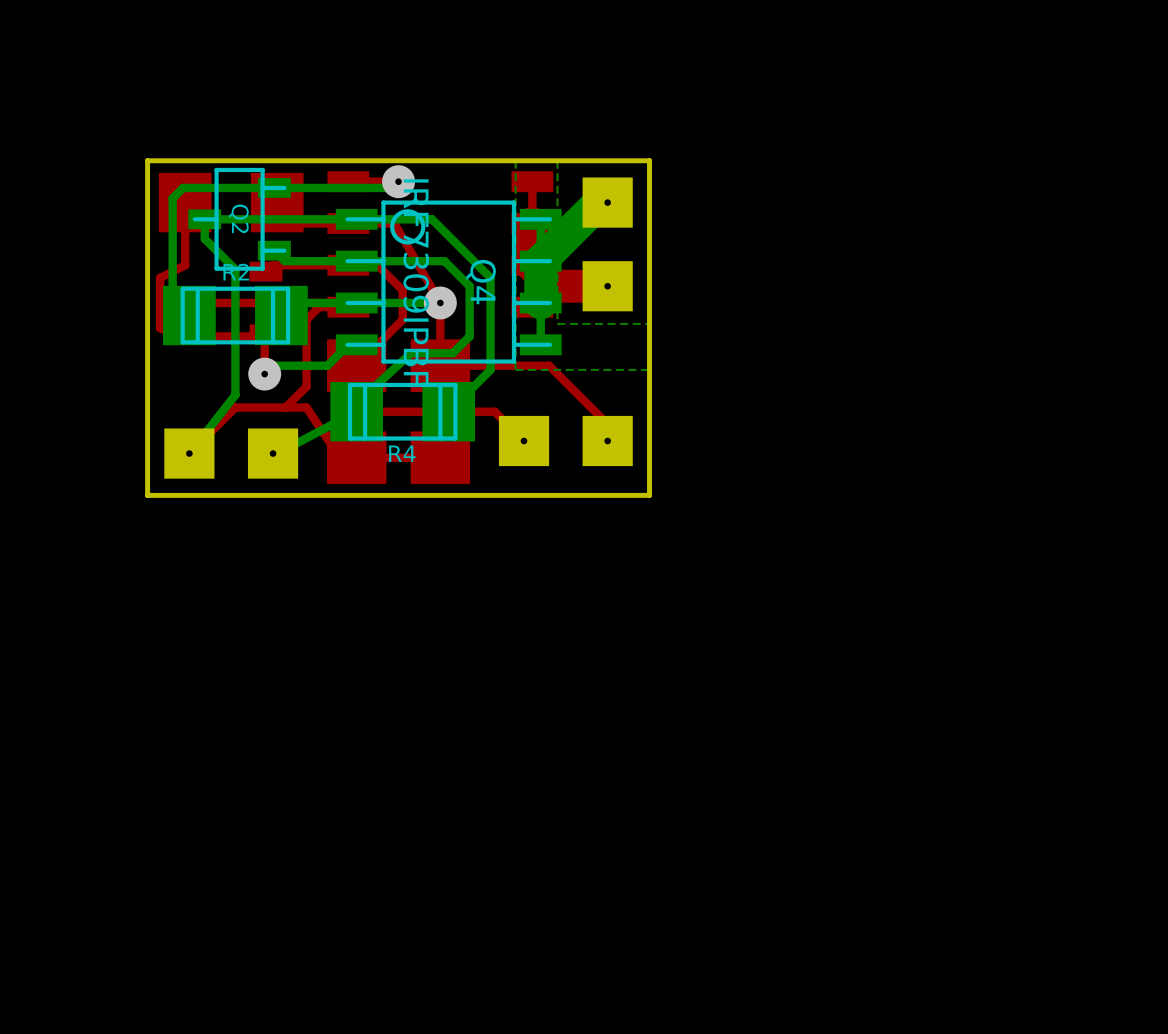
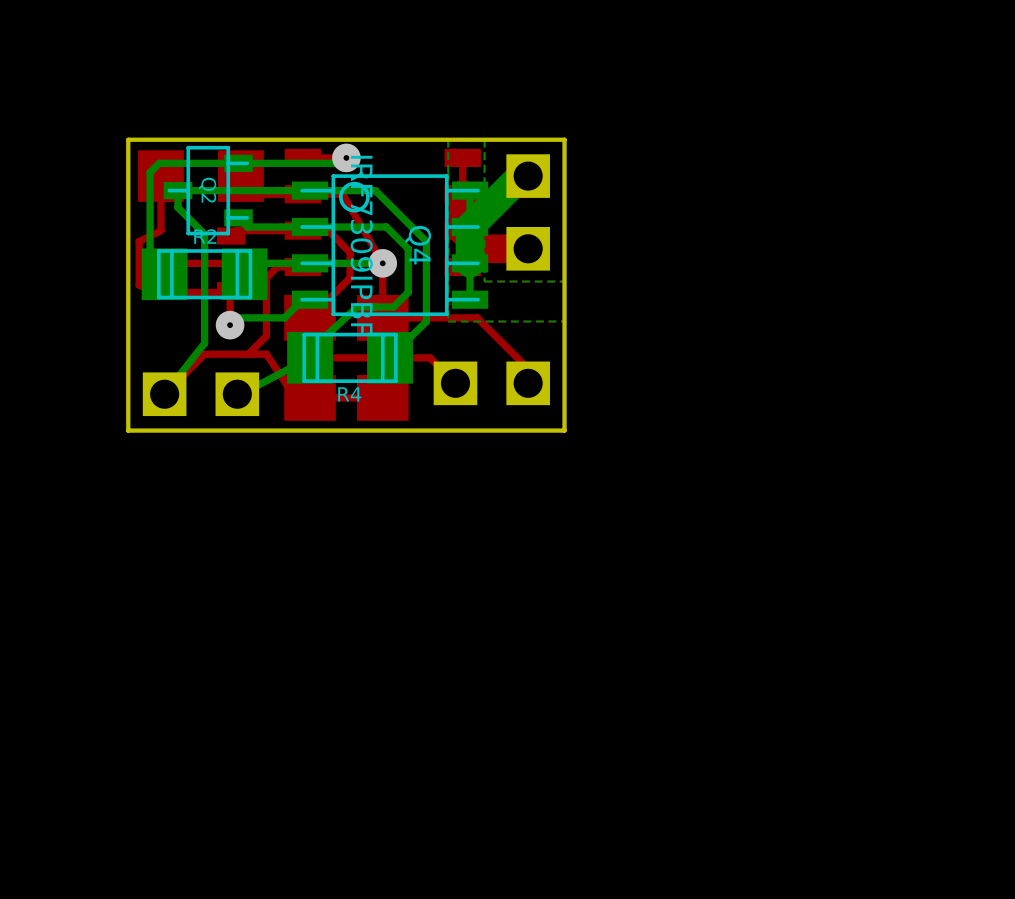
part footprint: [582, 177, 633, 228] -> [506, 154, 550, 198]
part footprint: [582, 261, 633, 312] -> [506, 226, 550, 271]
part footprint: [498, 415, 550, 467] -> [433, 361, 478, 406]
part footprint: [582, 415, 633, 467] -> [506, 361, 550, 406]
part footprint: [164, 428, 215, 479] -> [142, 372, 187, 417]
part footprint: [247, 428, 299, 479] -> [215, 372, 260, 417]

